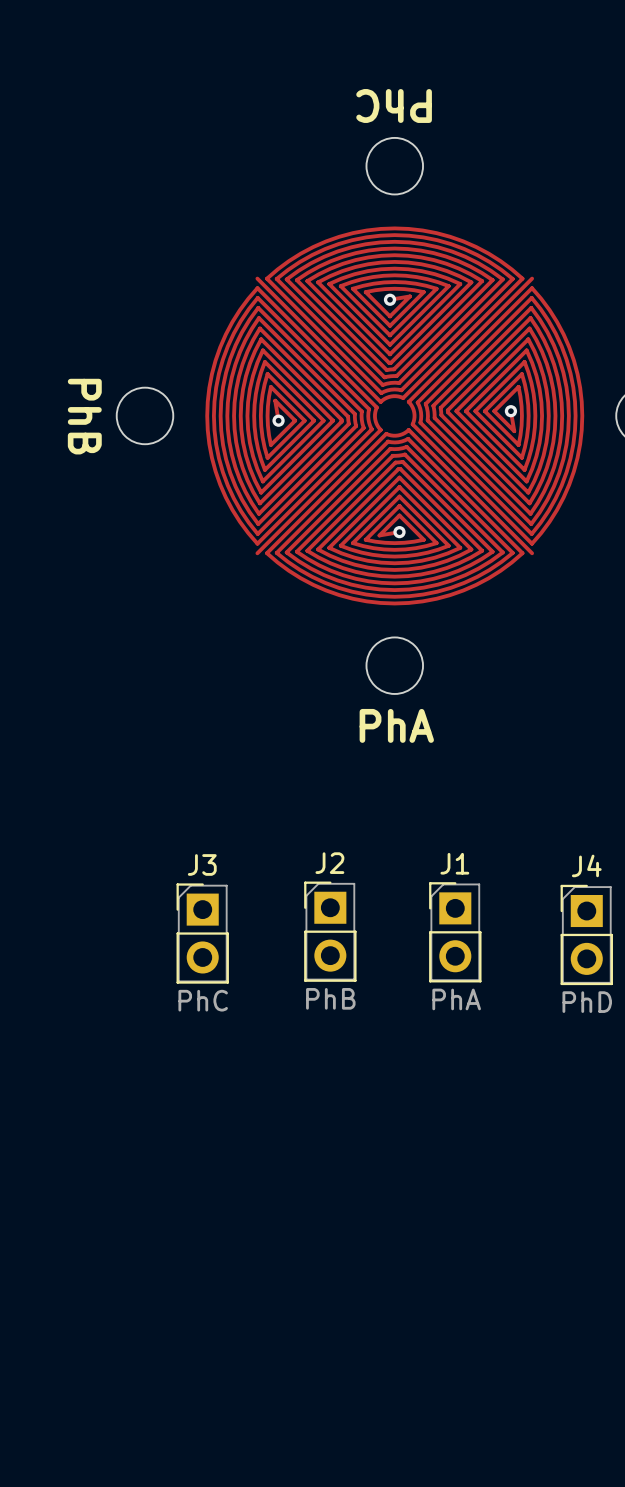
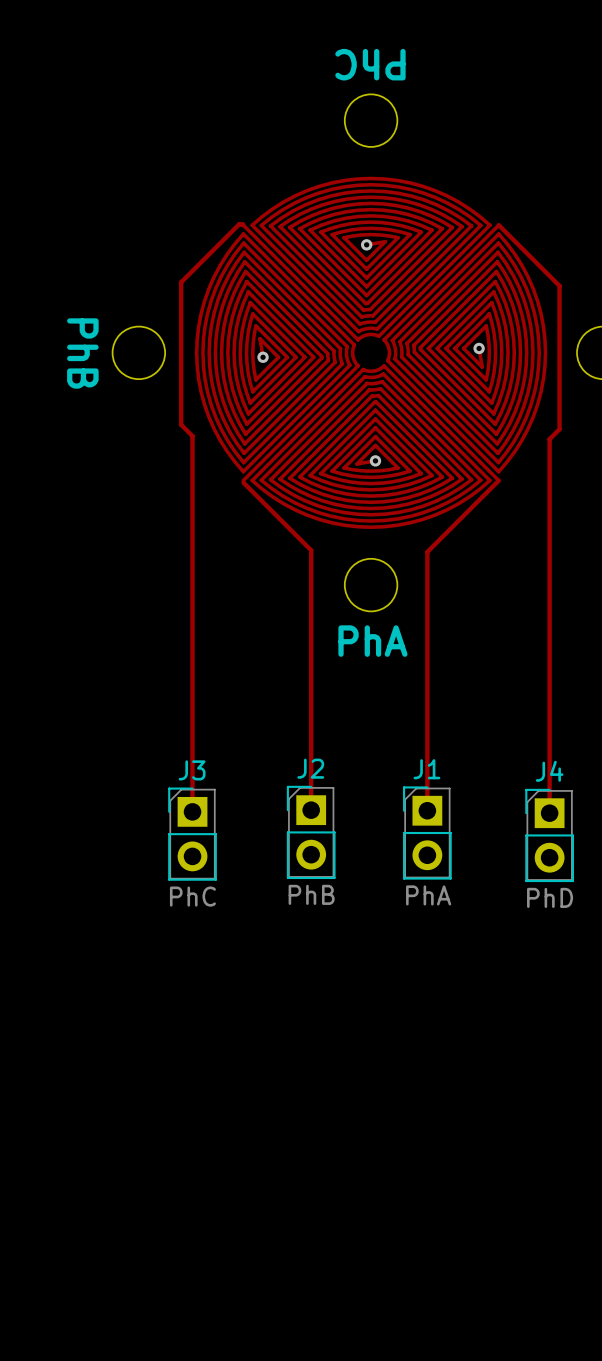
track: none -> (243, 225) (239, 224) (181, 282) (181, 424) (192, 436) (192, 811)
track: none -> (498, 225) (559, 285) (559, 429) (549, 439) (549, 813)
track: none -> (498, 480) (427, 551) (427, 810)
track: none -> (243, 482) (311, 550) (311, 810)

